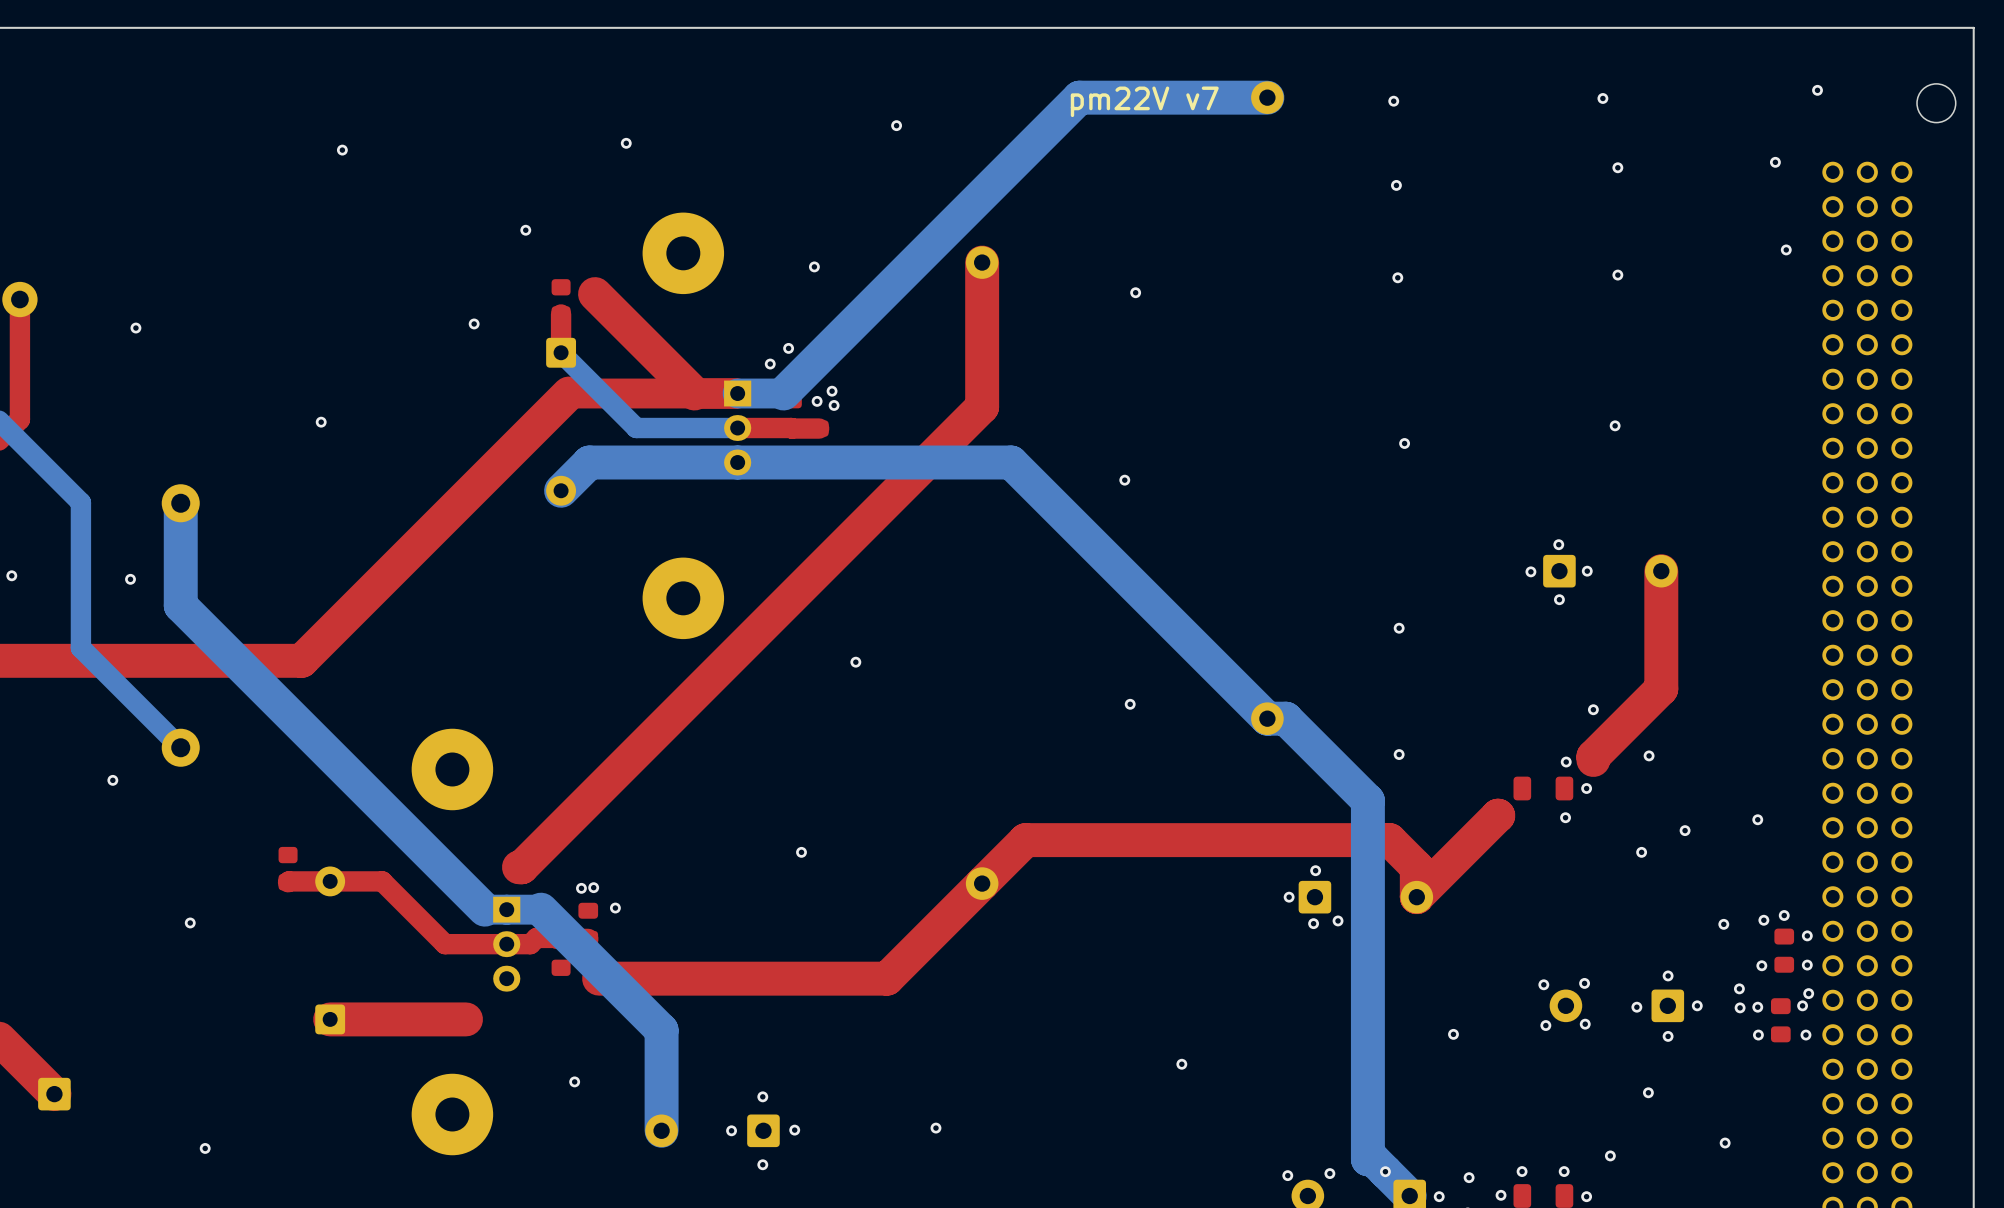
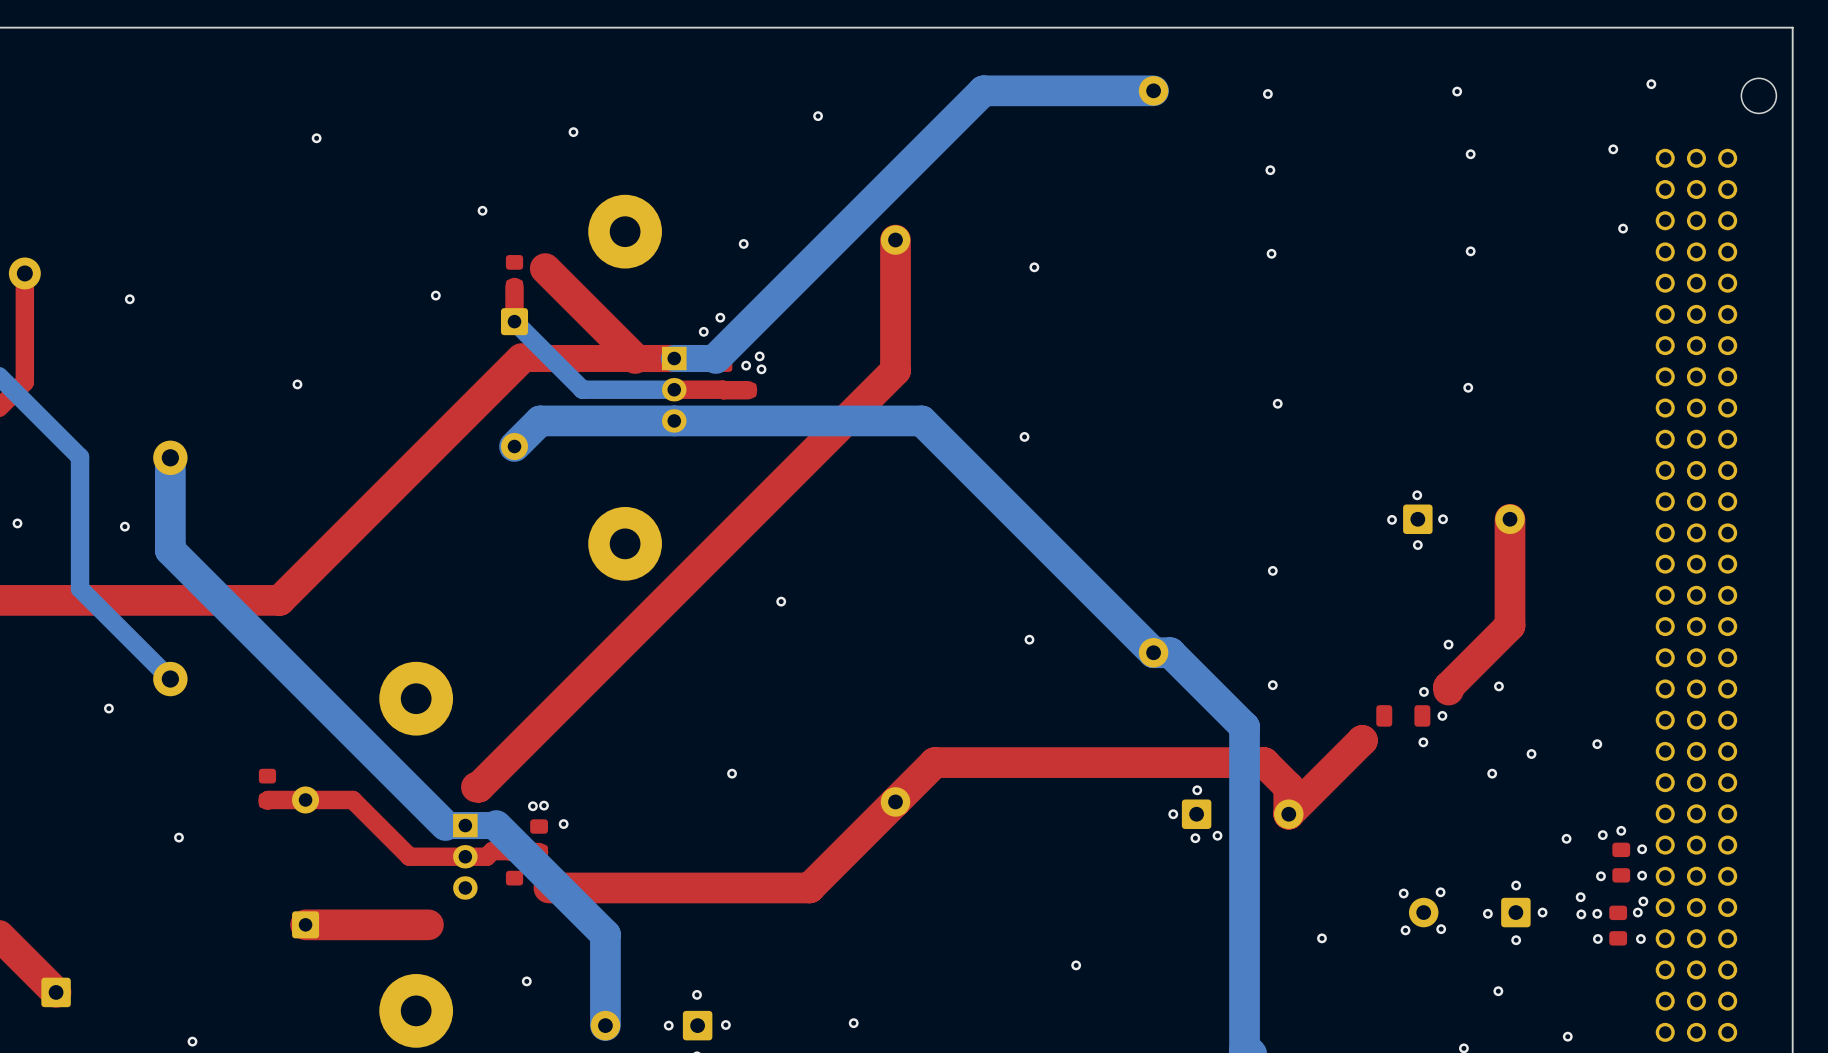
text: pm22V v7 (1144, 101) -> none

